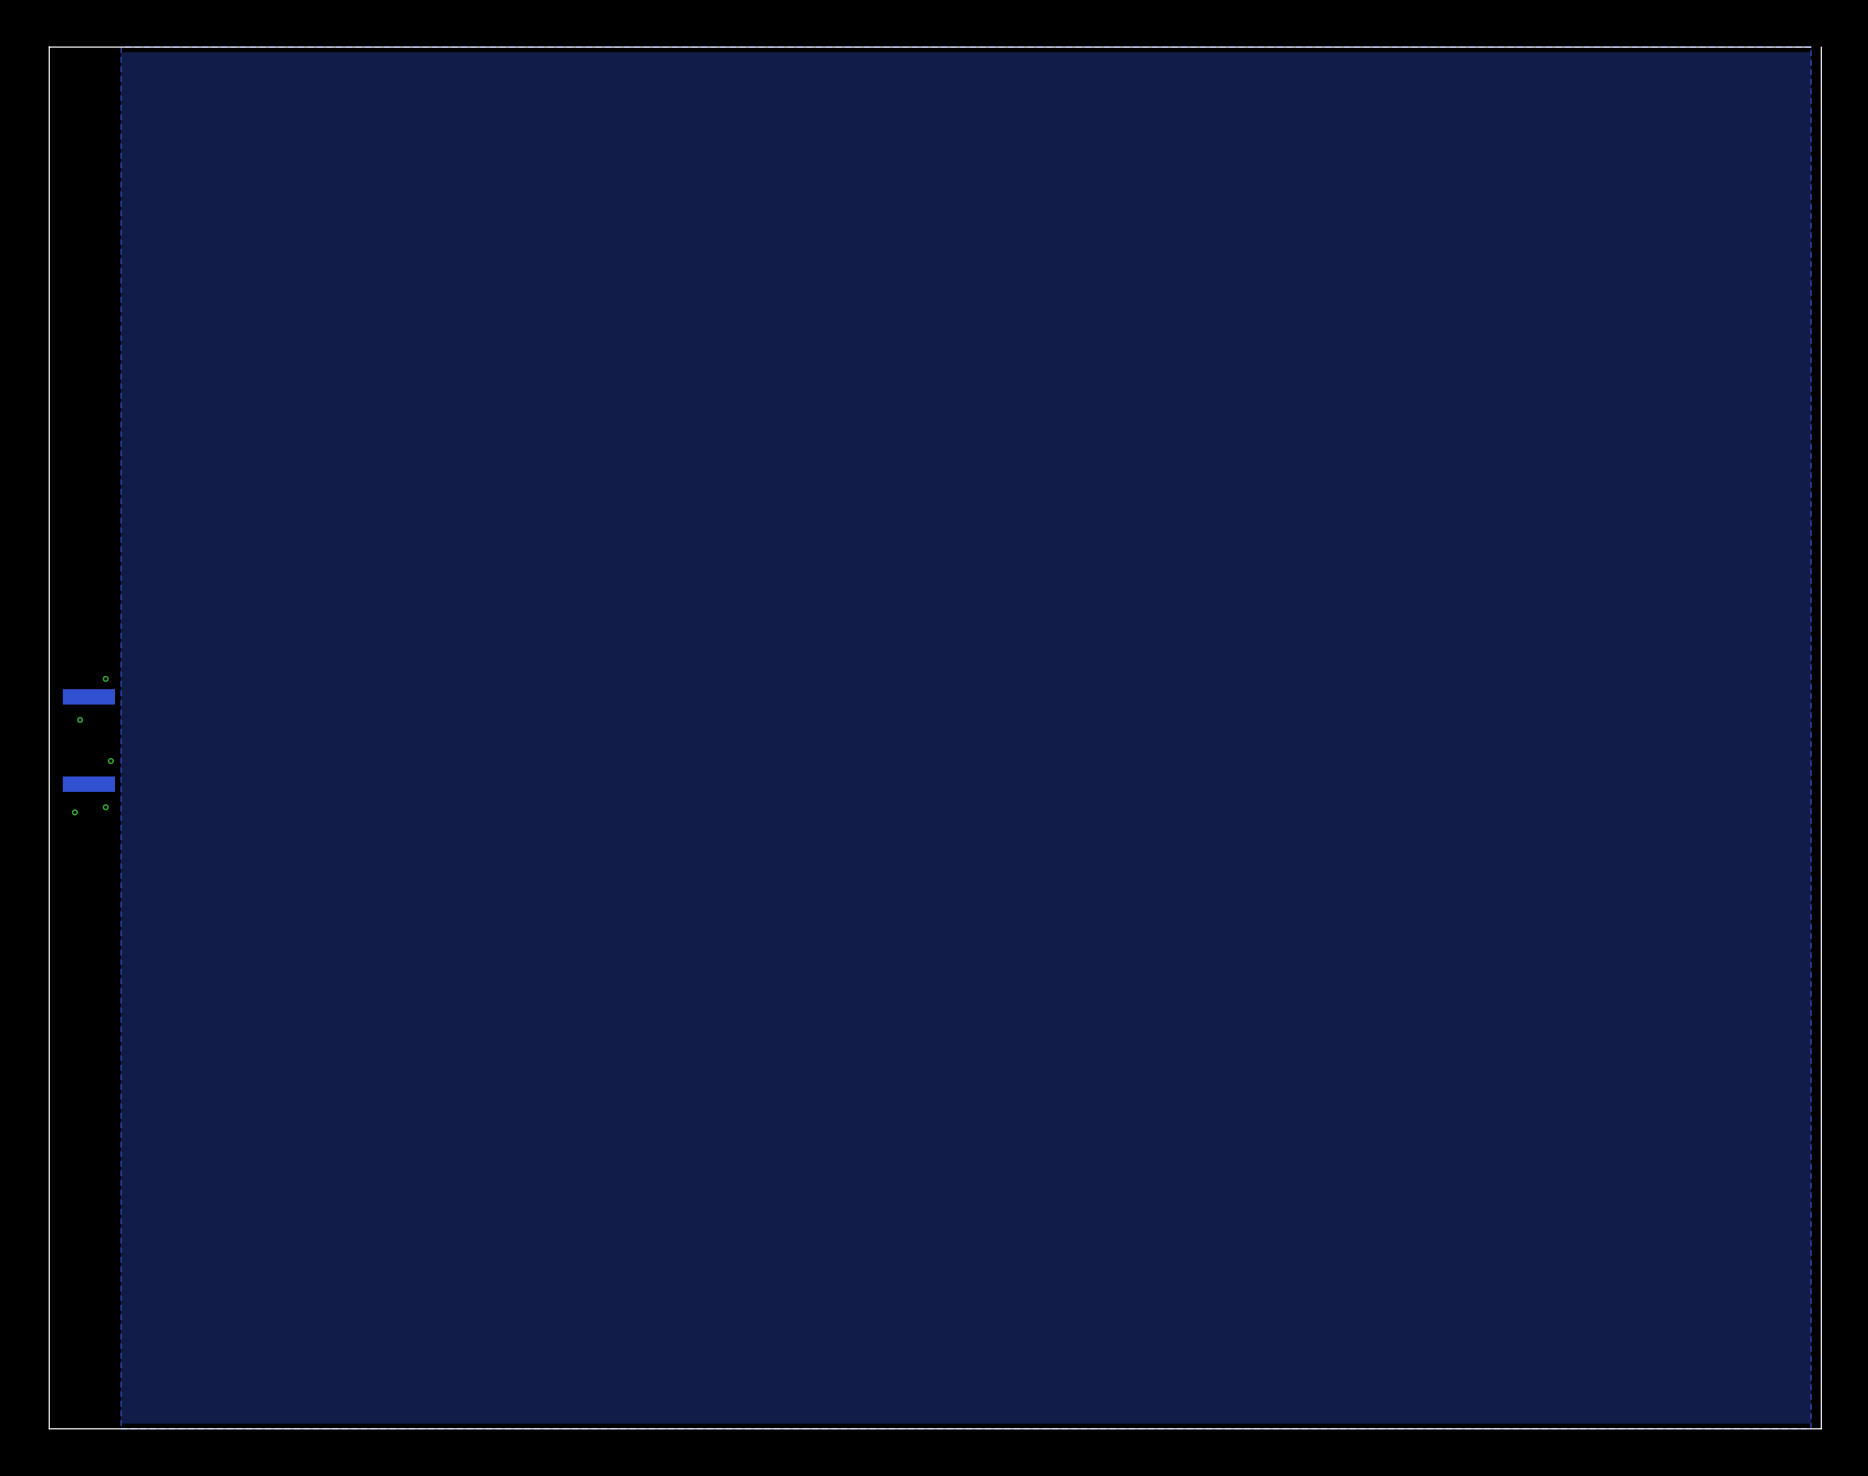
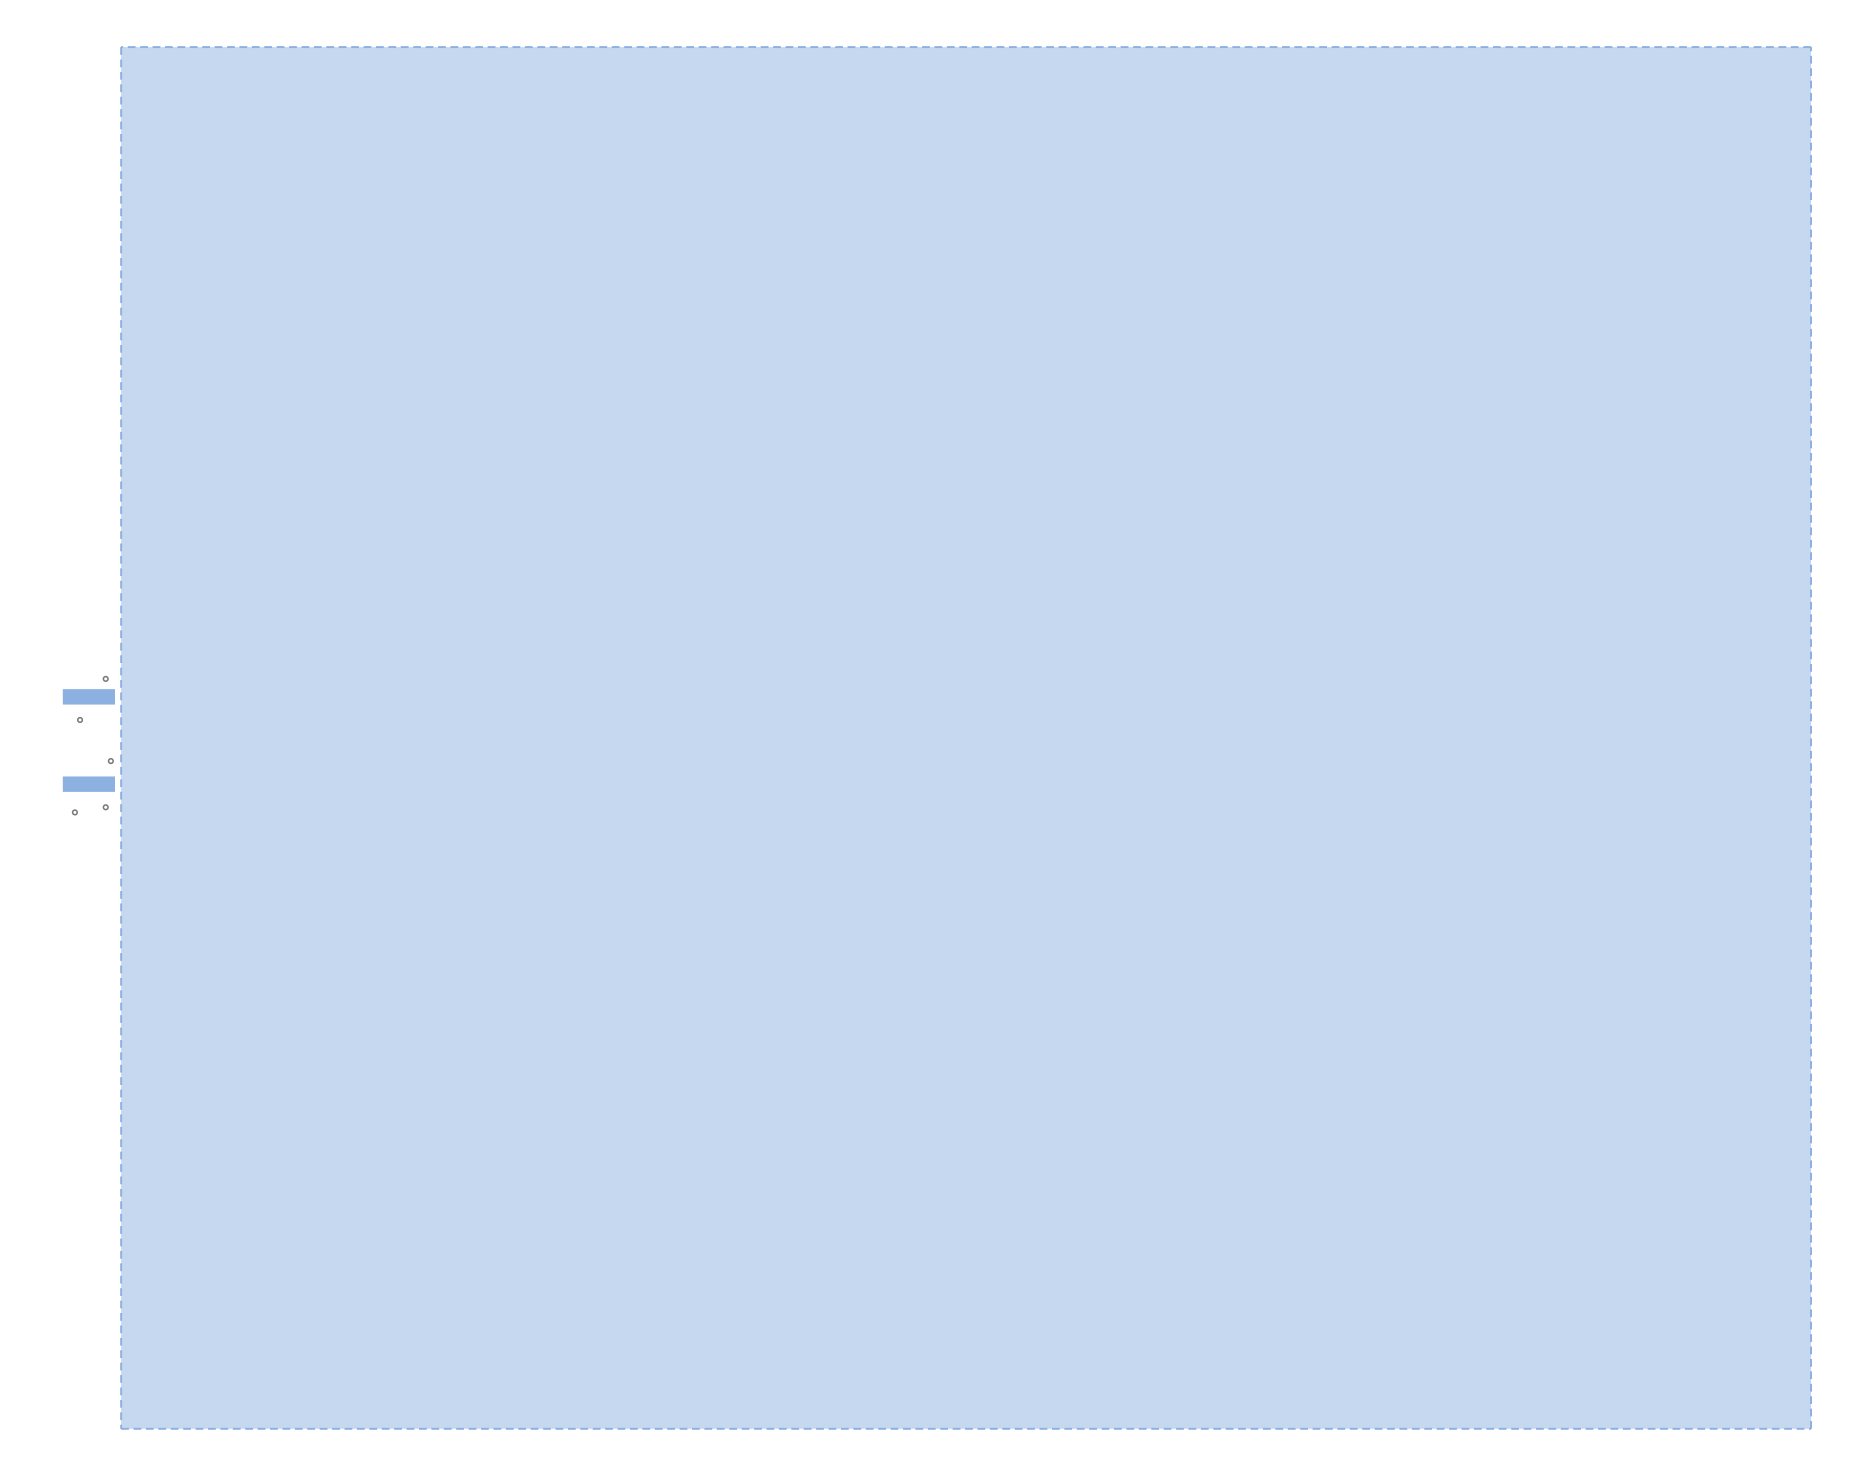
board edge: (1821, 47) (1821, 1428) (49, 1428) (49, 47) (1811, 47) -> none

